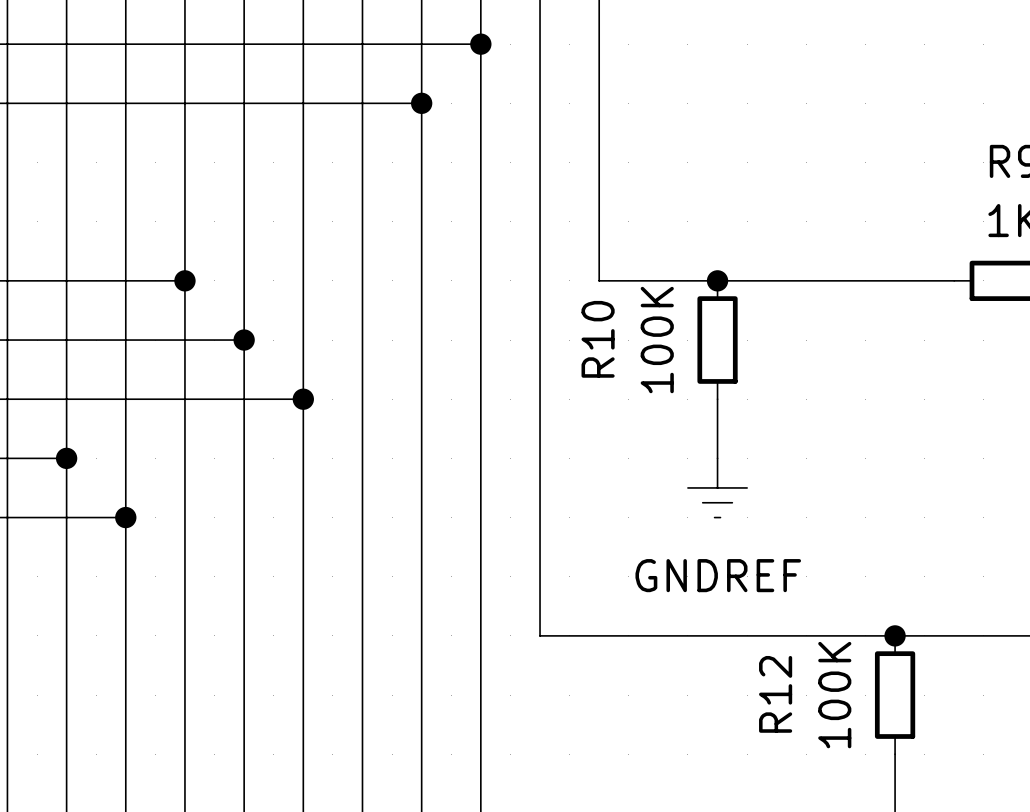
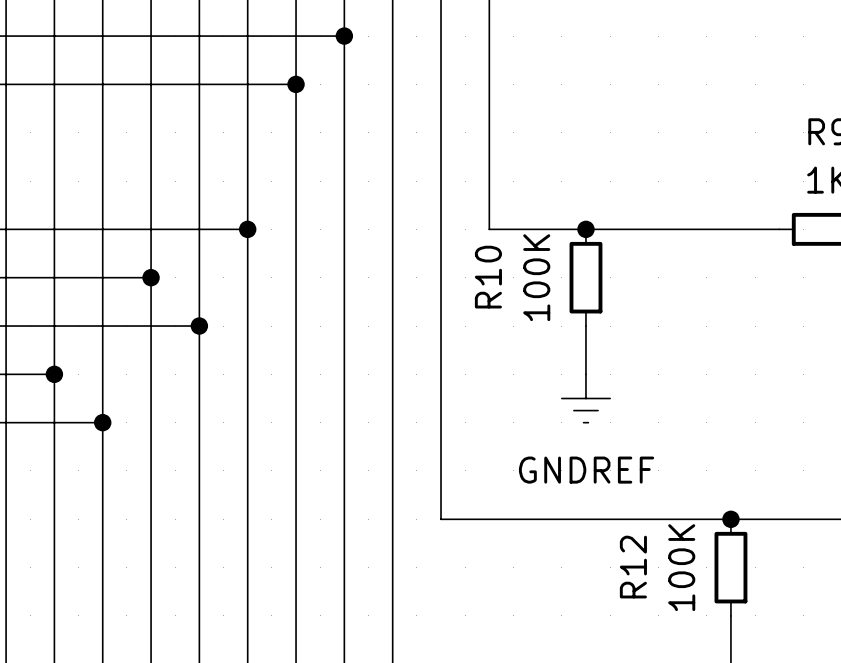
wire: (421, 44) (480, 44) -> none
junction: none -> (344, 36)
junction: (480, 44) -> none
wire: (362, 103) (421, 103) -> none
junction: none -> (296, 84)
junction: (421, 103) -> none
wire: none -> (151, 229) (247, 229)
junction: (184, 280) -> none
junction: none -> (247, 229)
wire: (184, 340) (244, 340) -> none
junction: none -> (151, 277)
junction: (244, 340) -> none
wire: (244, 399) (303, 399) -> none
junction: none -> (199, 326)
junction: (303, 399) -> none

